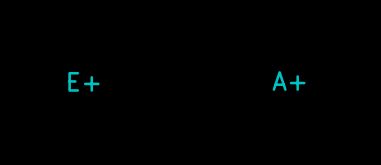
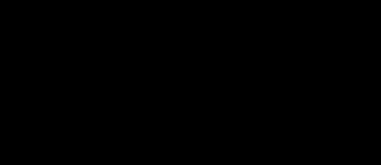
text: A+ (289, 80) -> none
text: E+ (83, 81) -> none

